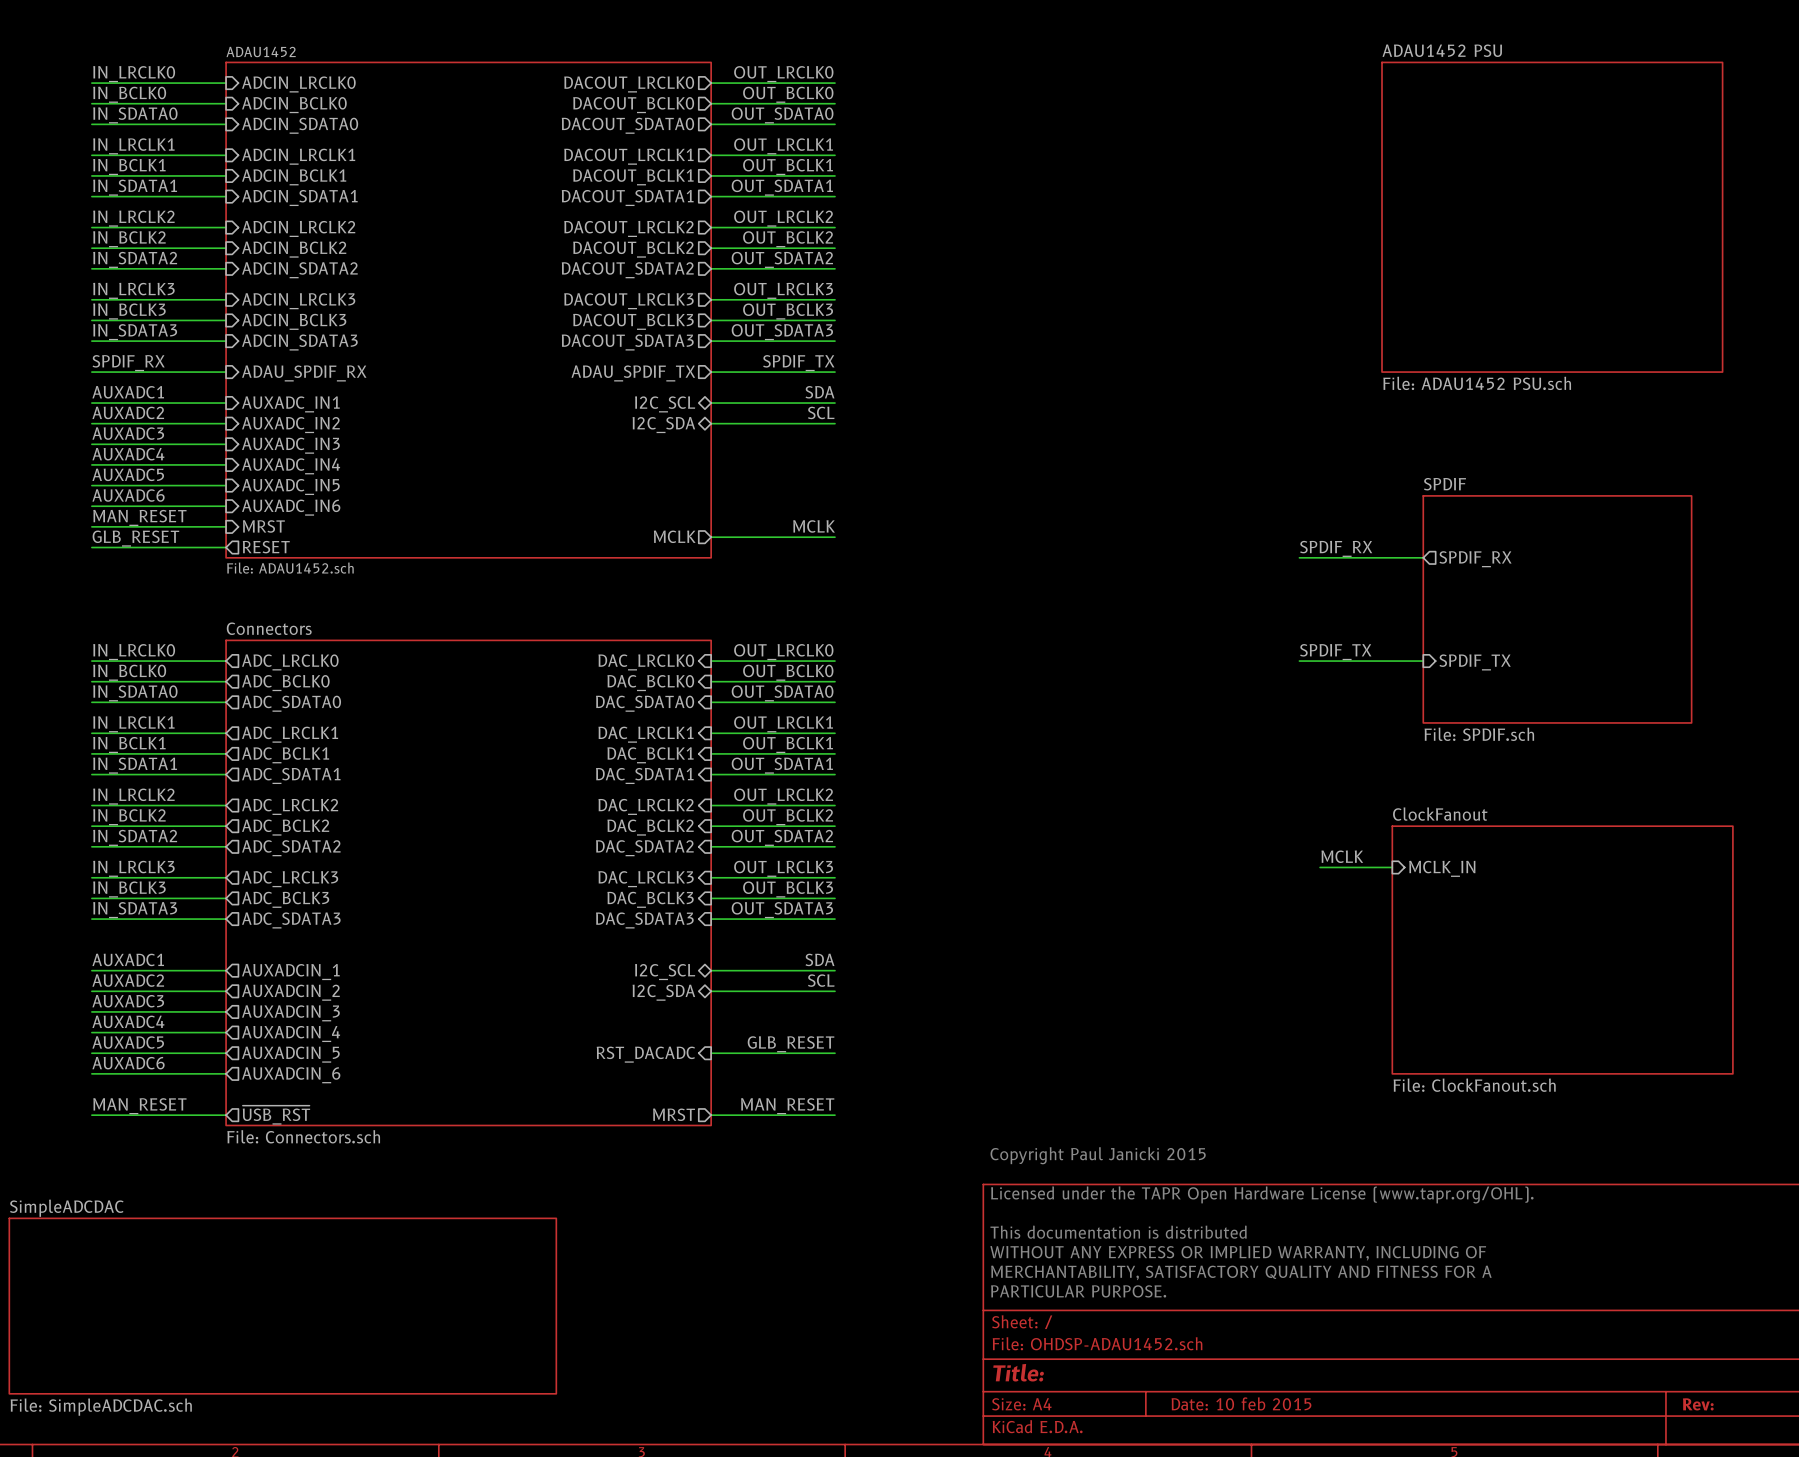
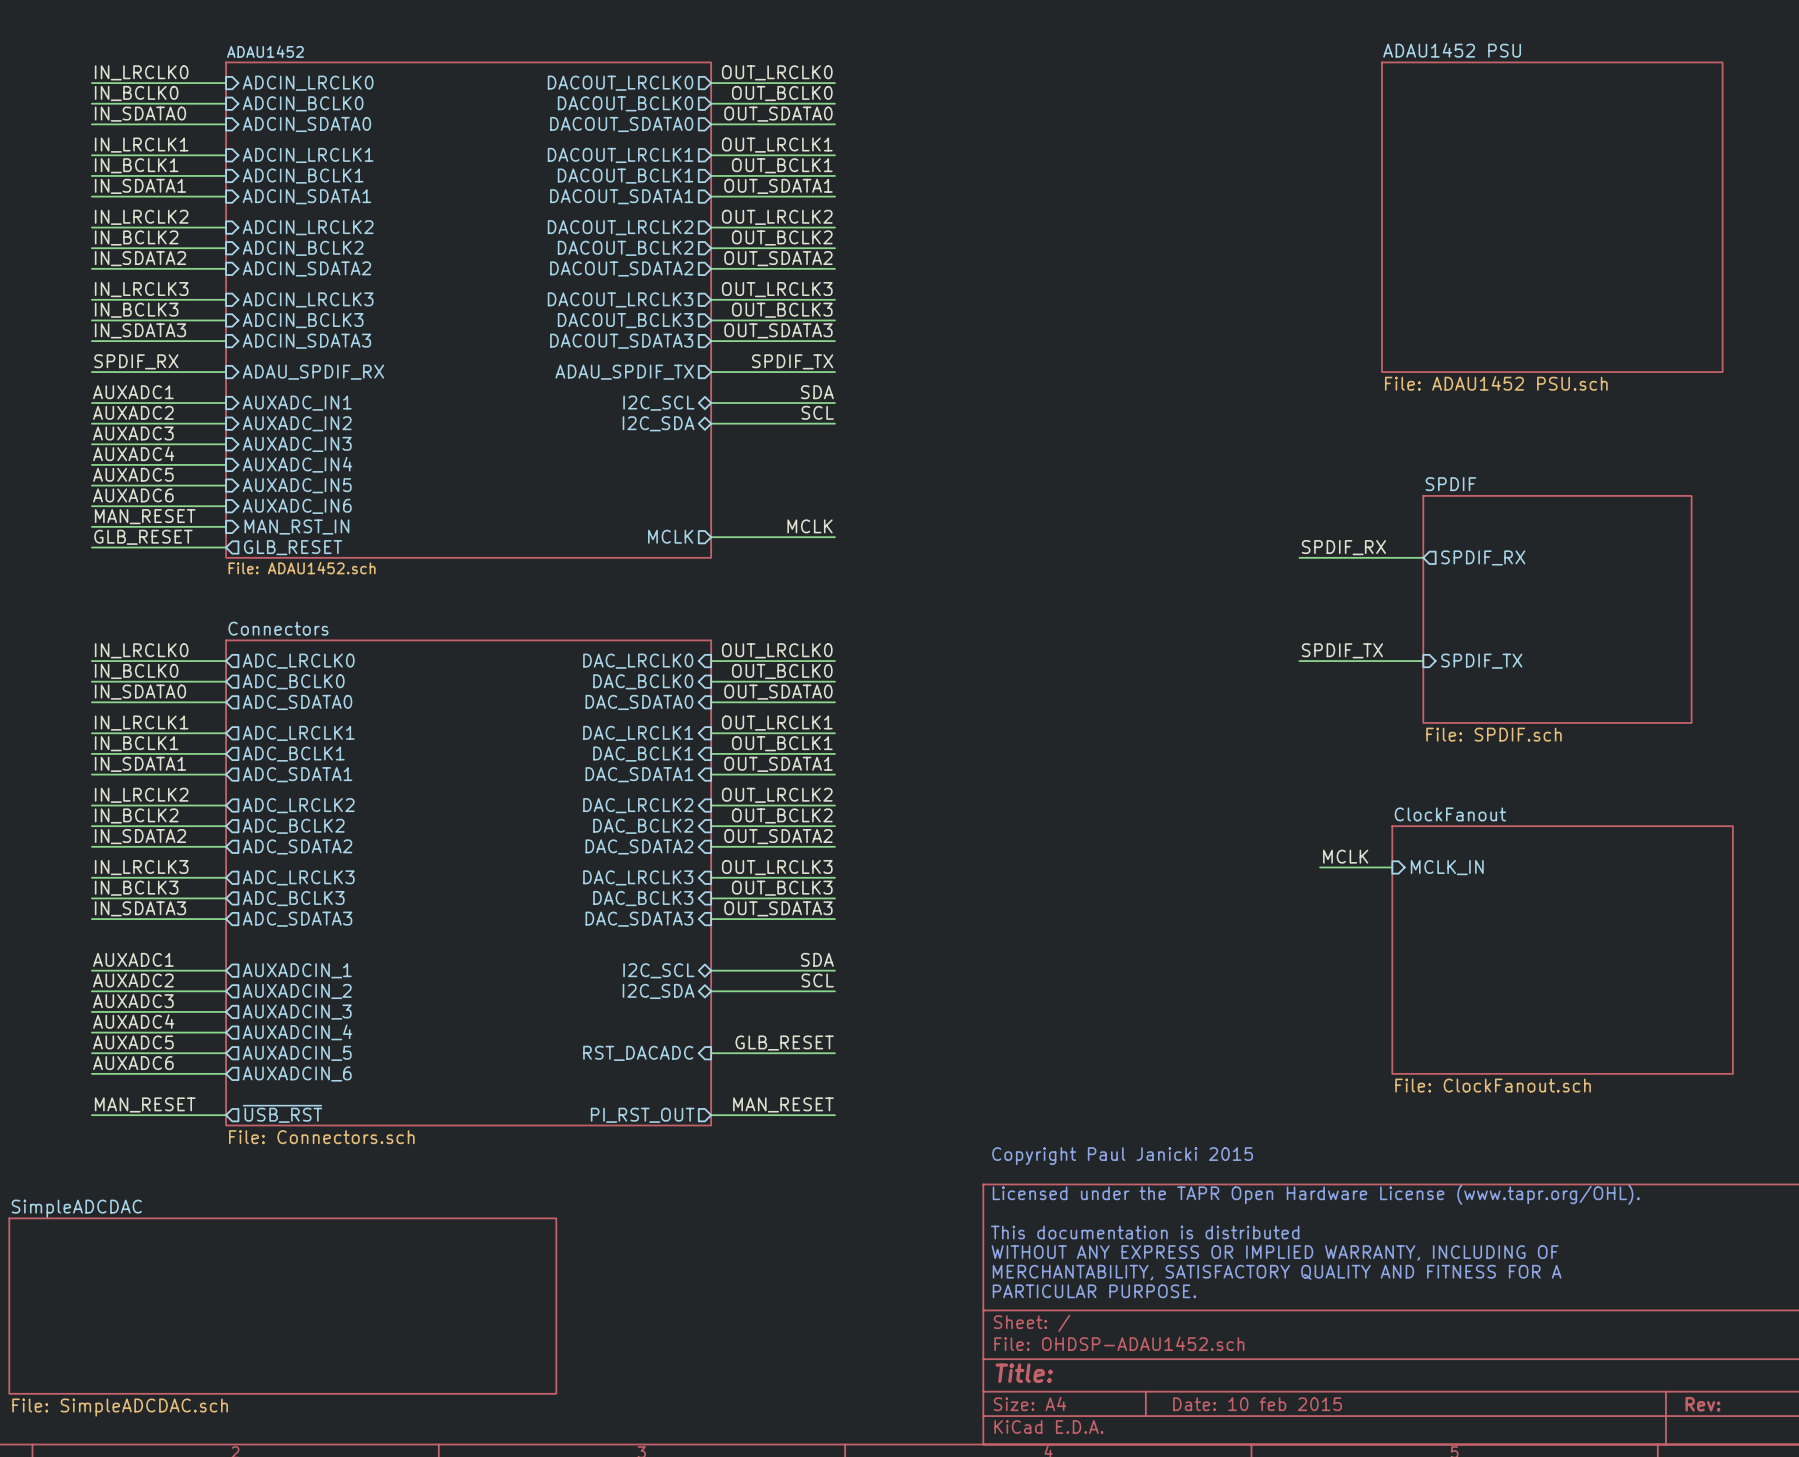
sheet pin: MRST (263, 526) -> MAN_RST_IN (296, 526)
sheet pin: RESET (266, 547) -> GLB_RESET (293, 547)
sheet pin: MRST (674, 1114) -> PI_RST_OUT (642, 1115)

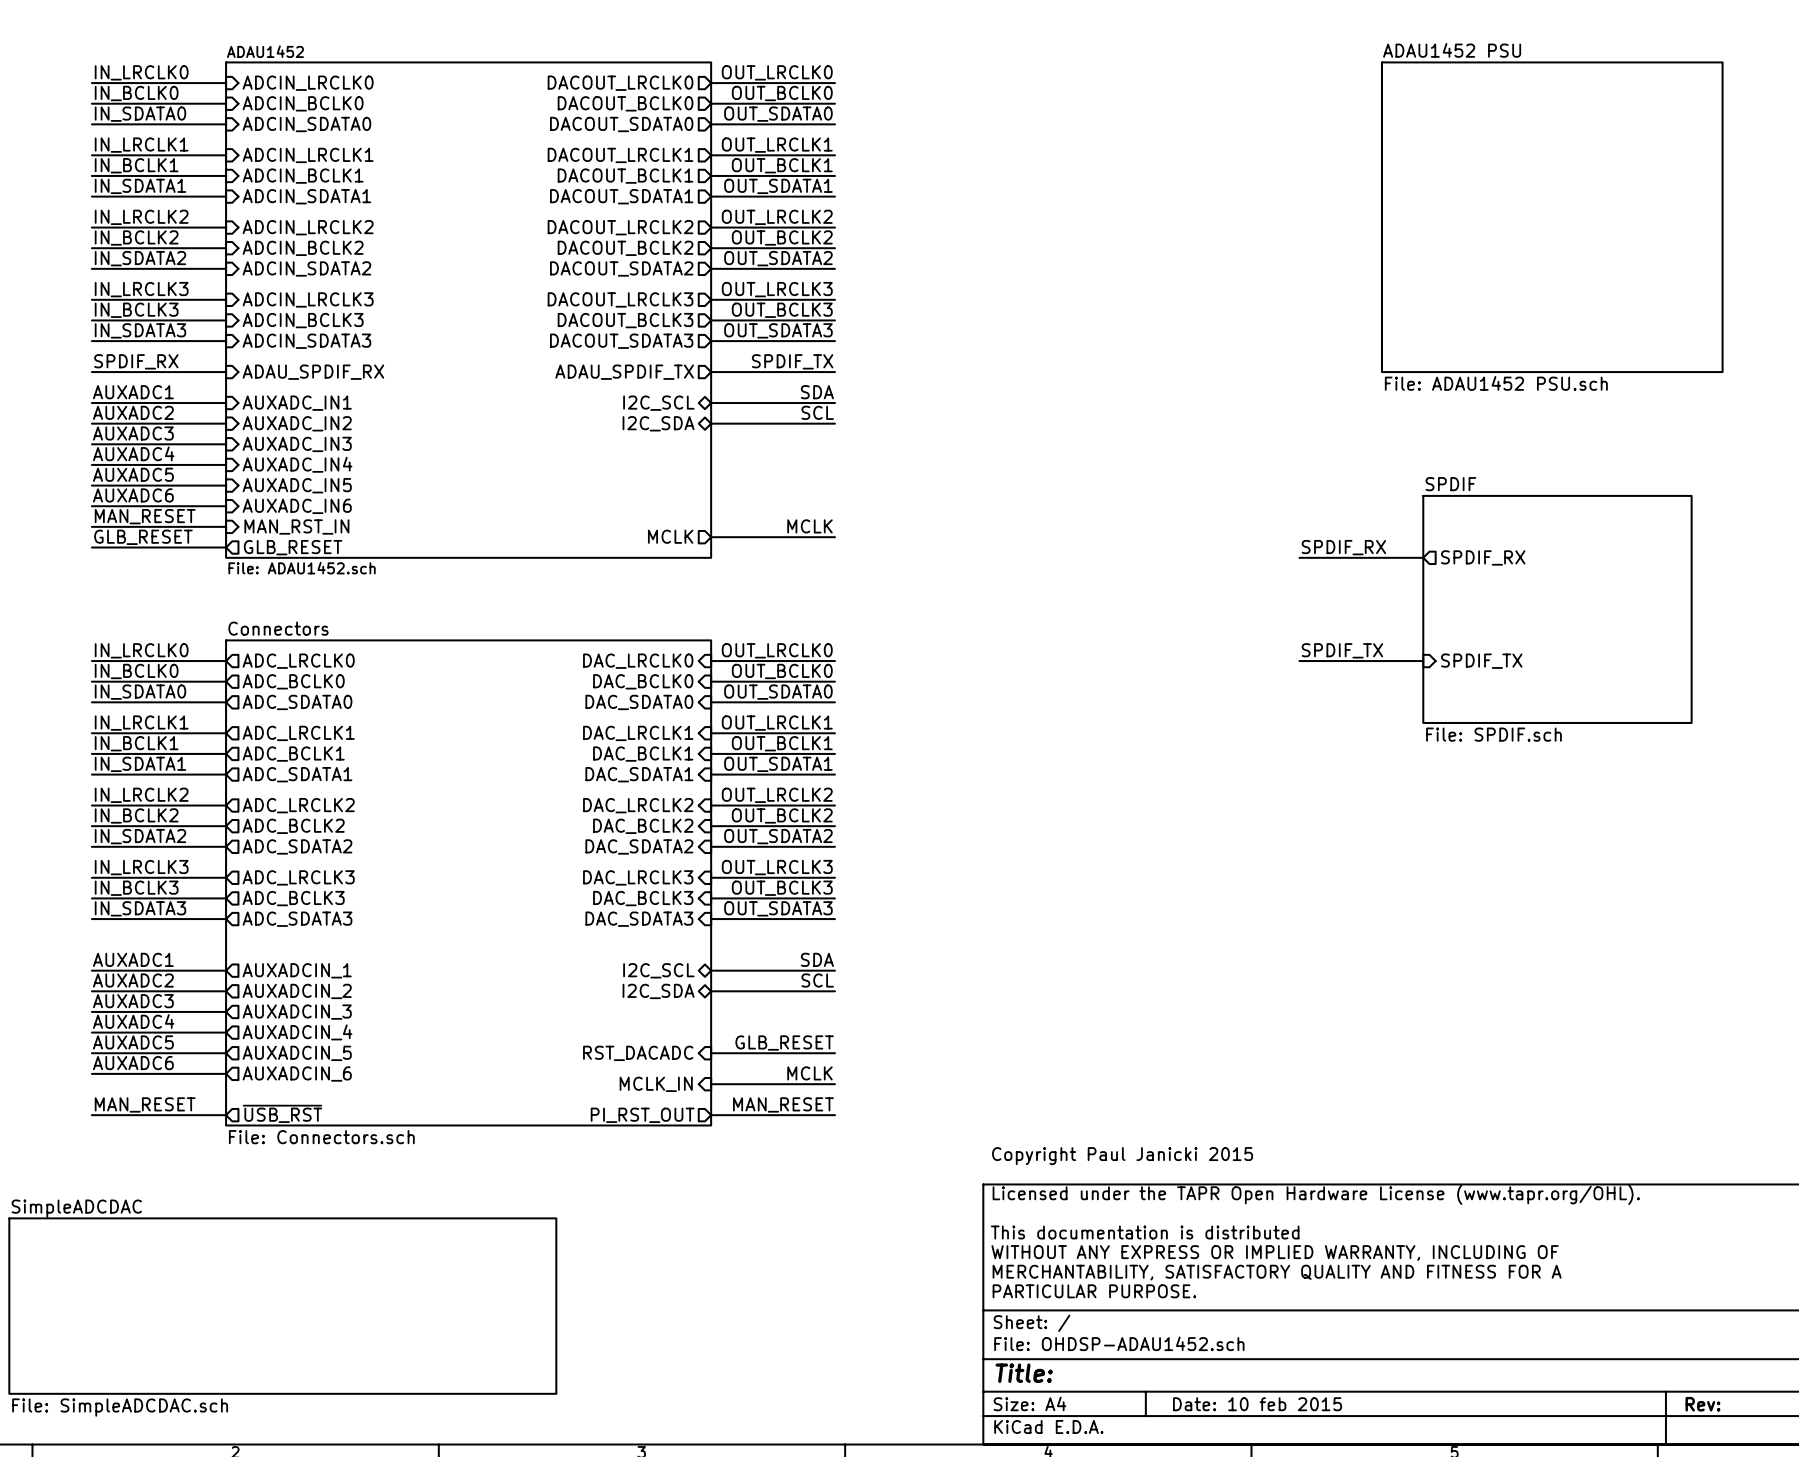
label: MCLK (1345, 856) -> none
wire: (1320, 867) (1392, 867) -> none
sheet pin: MCLK_IN (1447, 867) -> none
sheet ClockFanout: File: ClockFanout.sch (1562, 950) -> none
label: none -> MCLK (810, 1073)
sheet pin: none -> MCLK_IN (656, 1084)
wire: none -> (711, 1084) (834, 1084)

